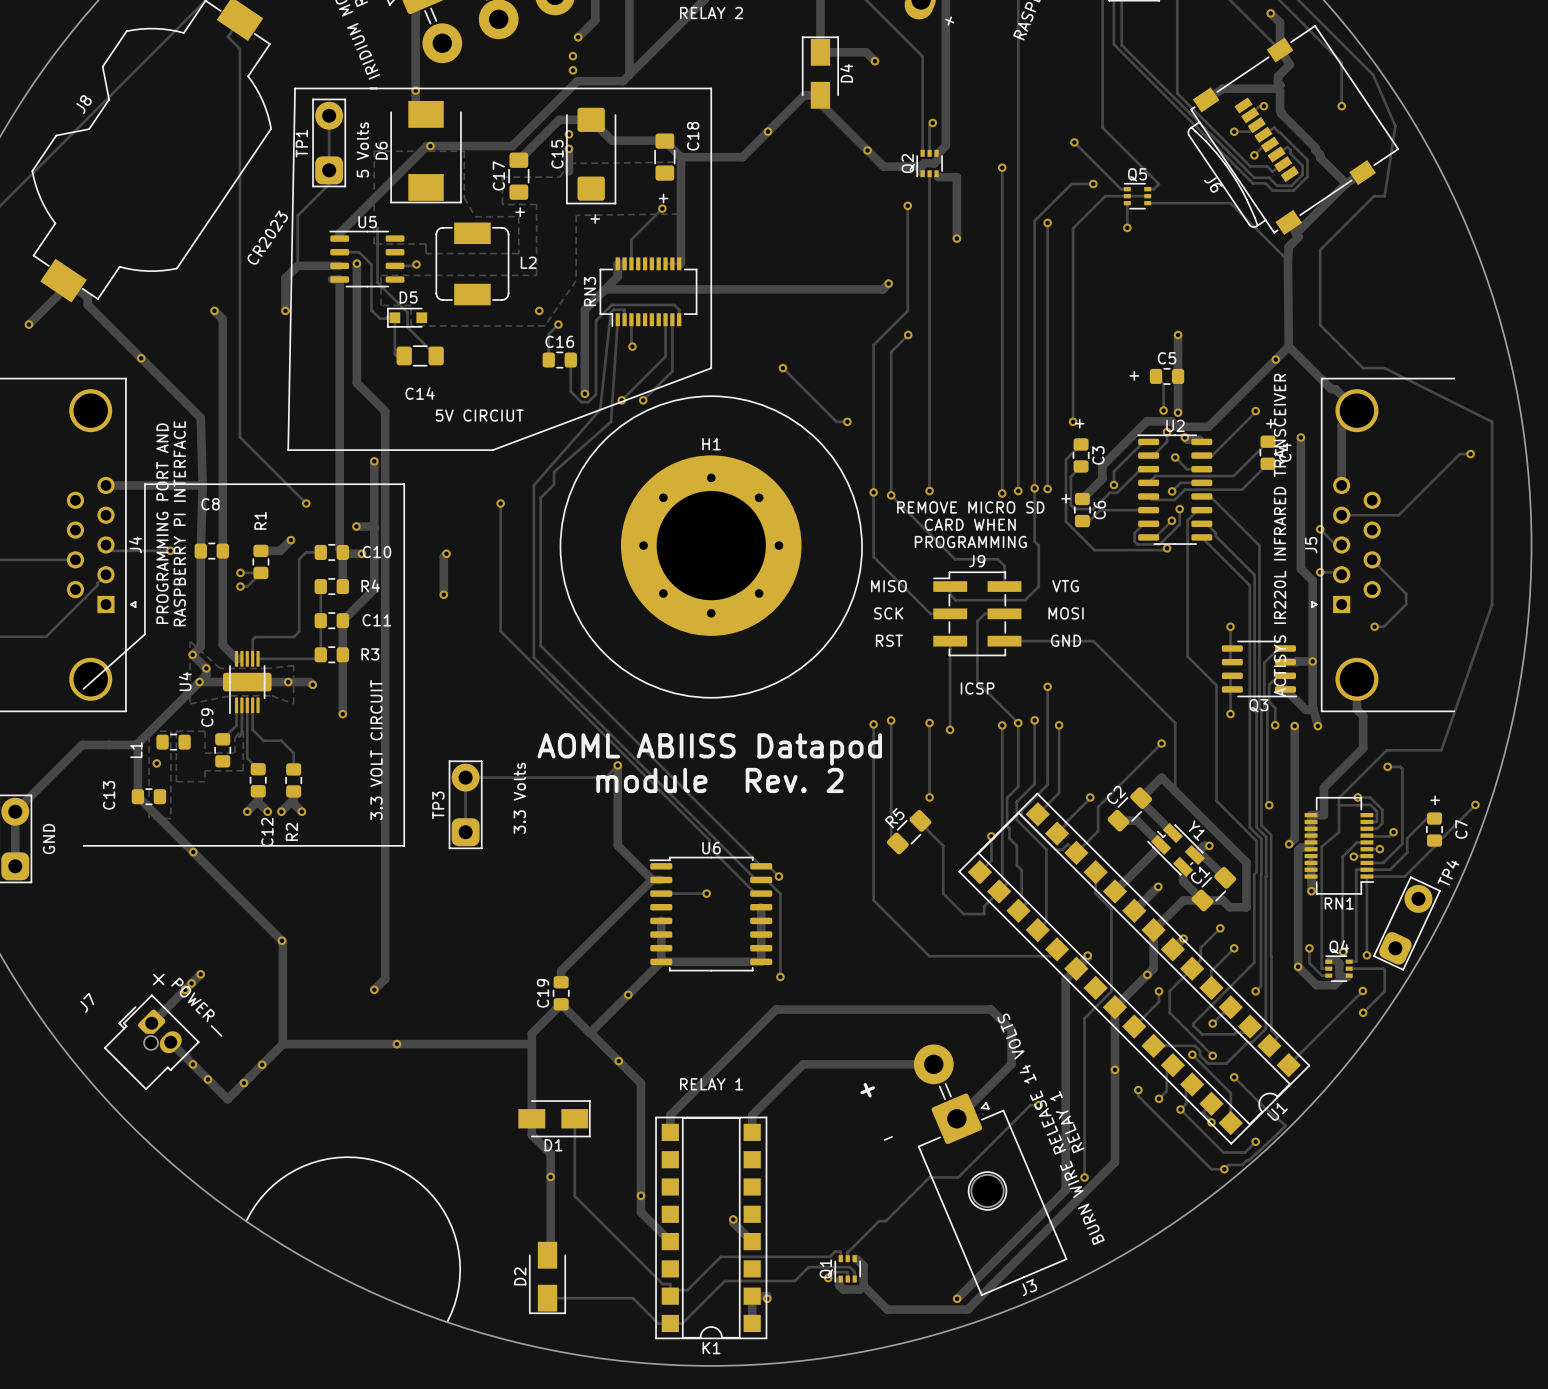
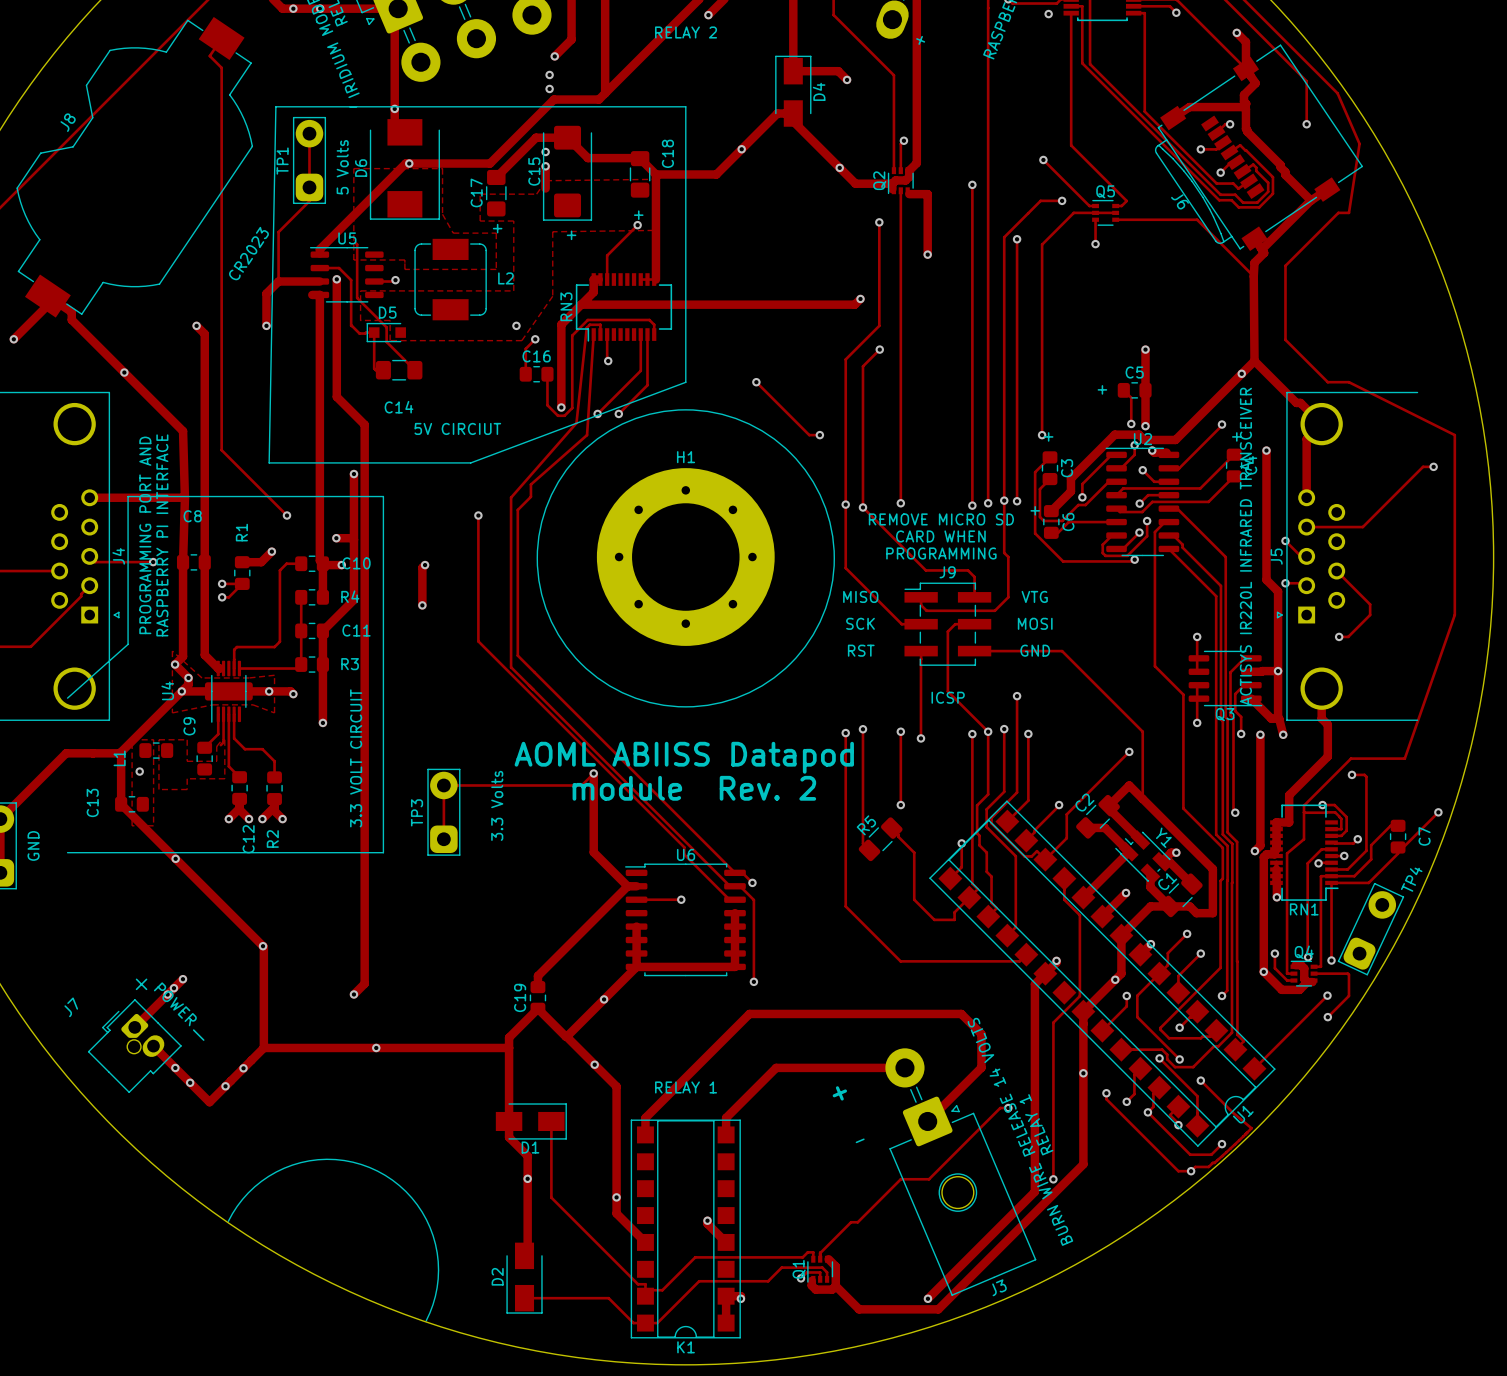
text: + (1435, 800) -> none

